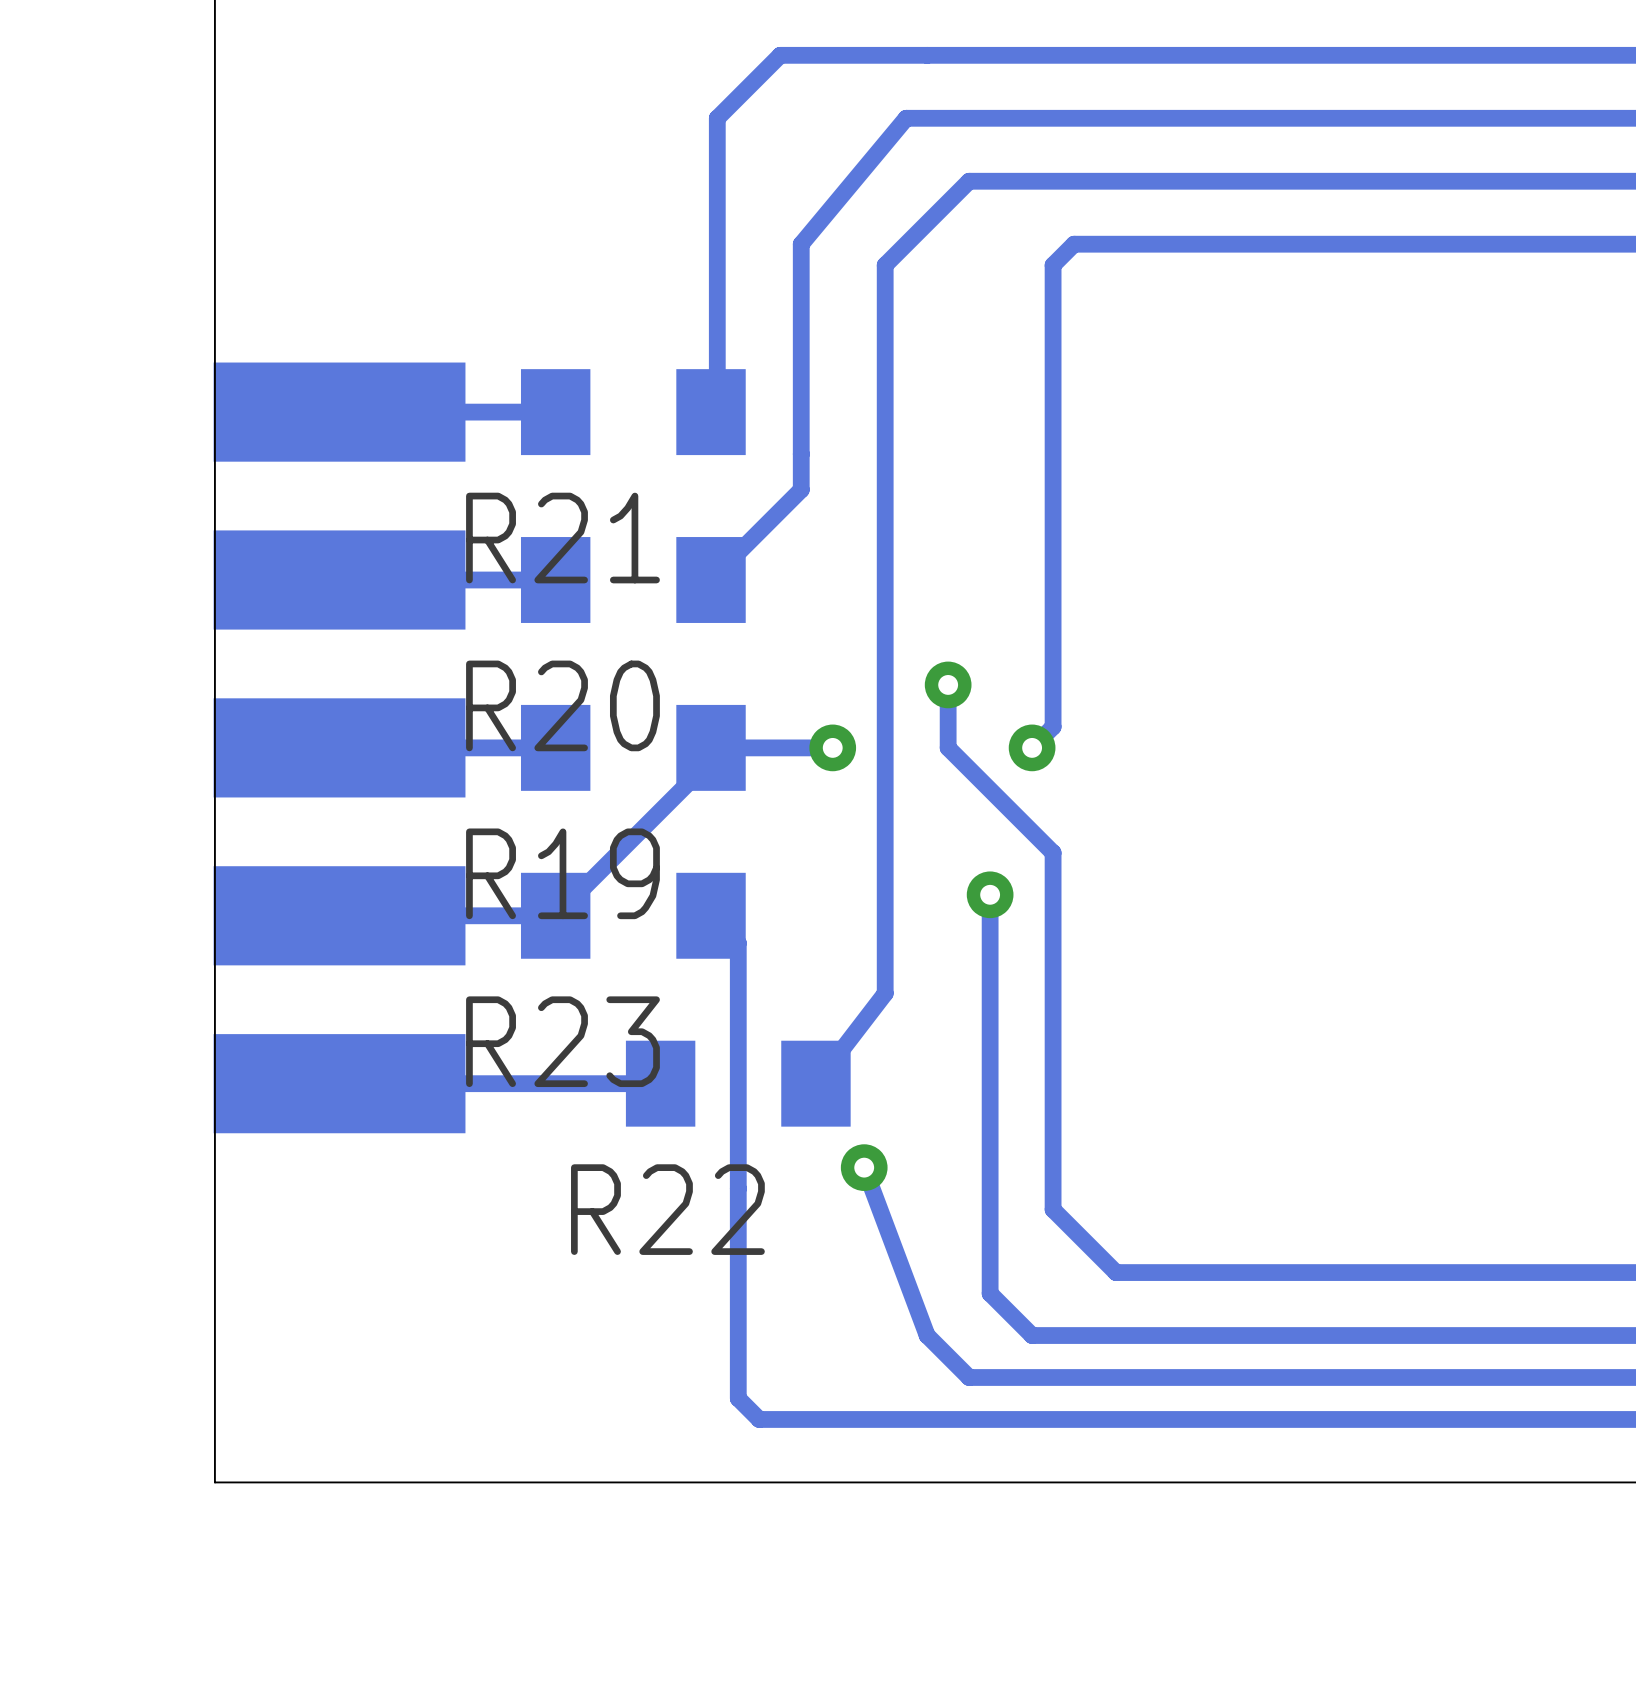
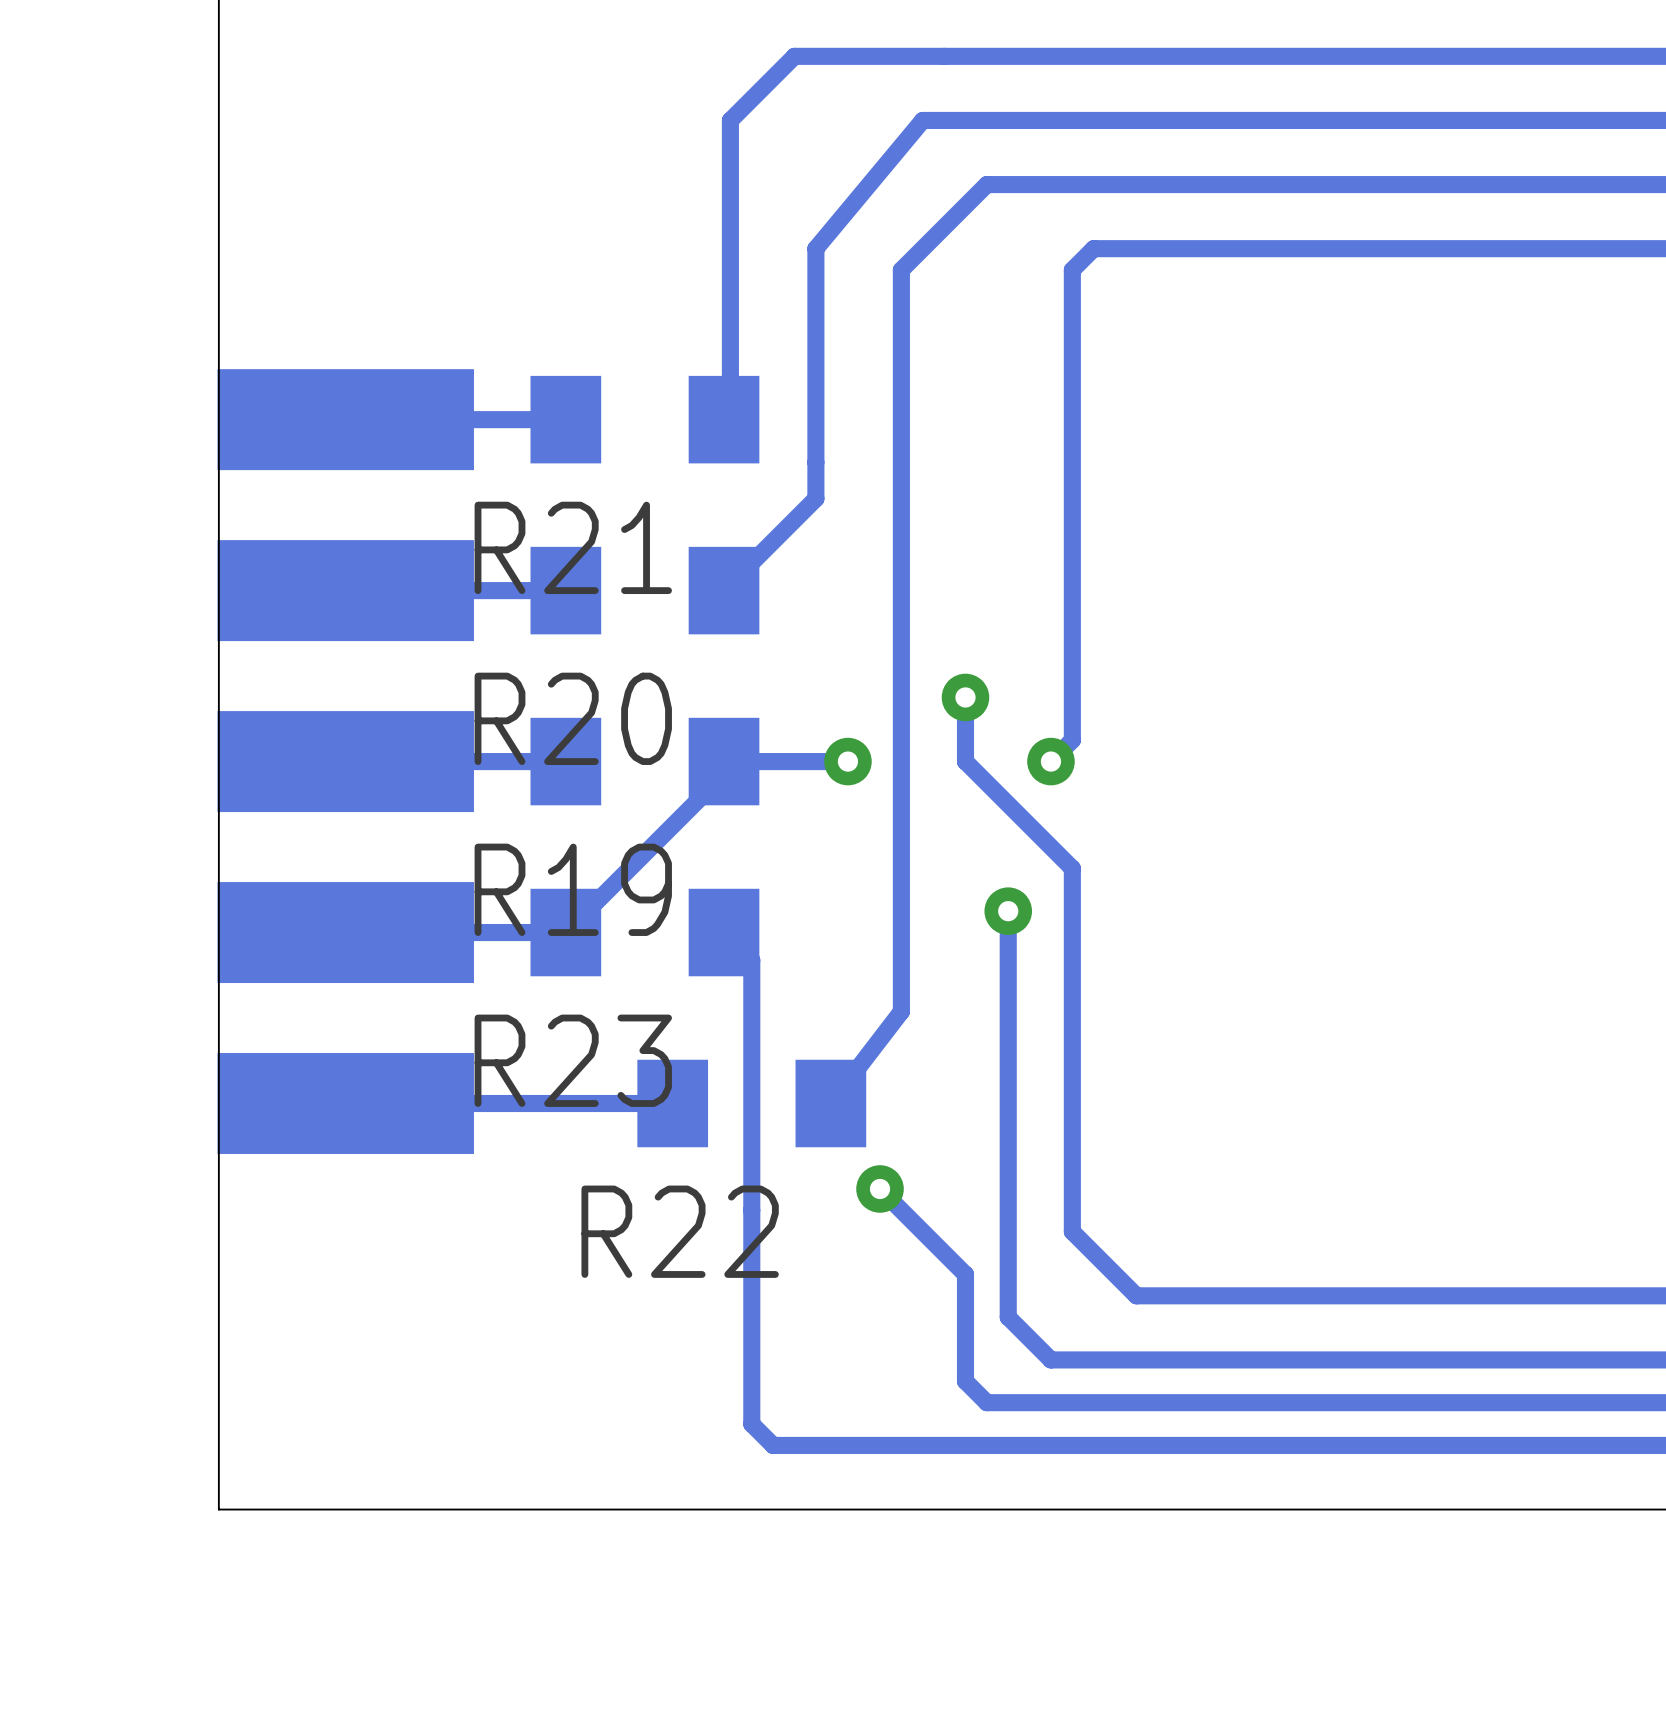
track: (864, 1167) (927, 1335) (948, 1356) -> (880, 1188) (965, 1274) (965, 1381)

